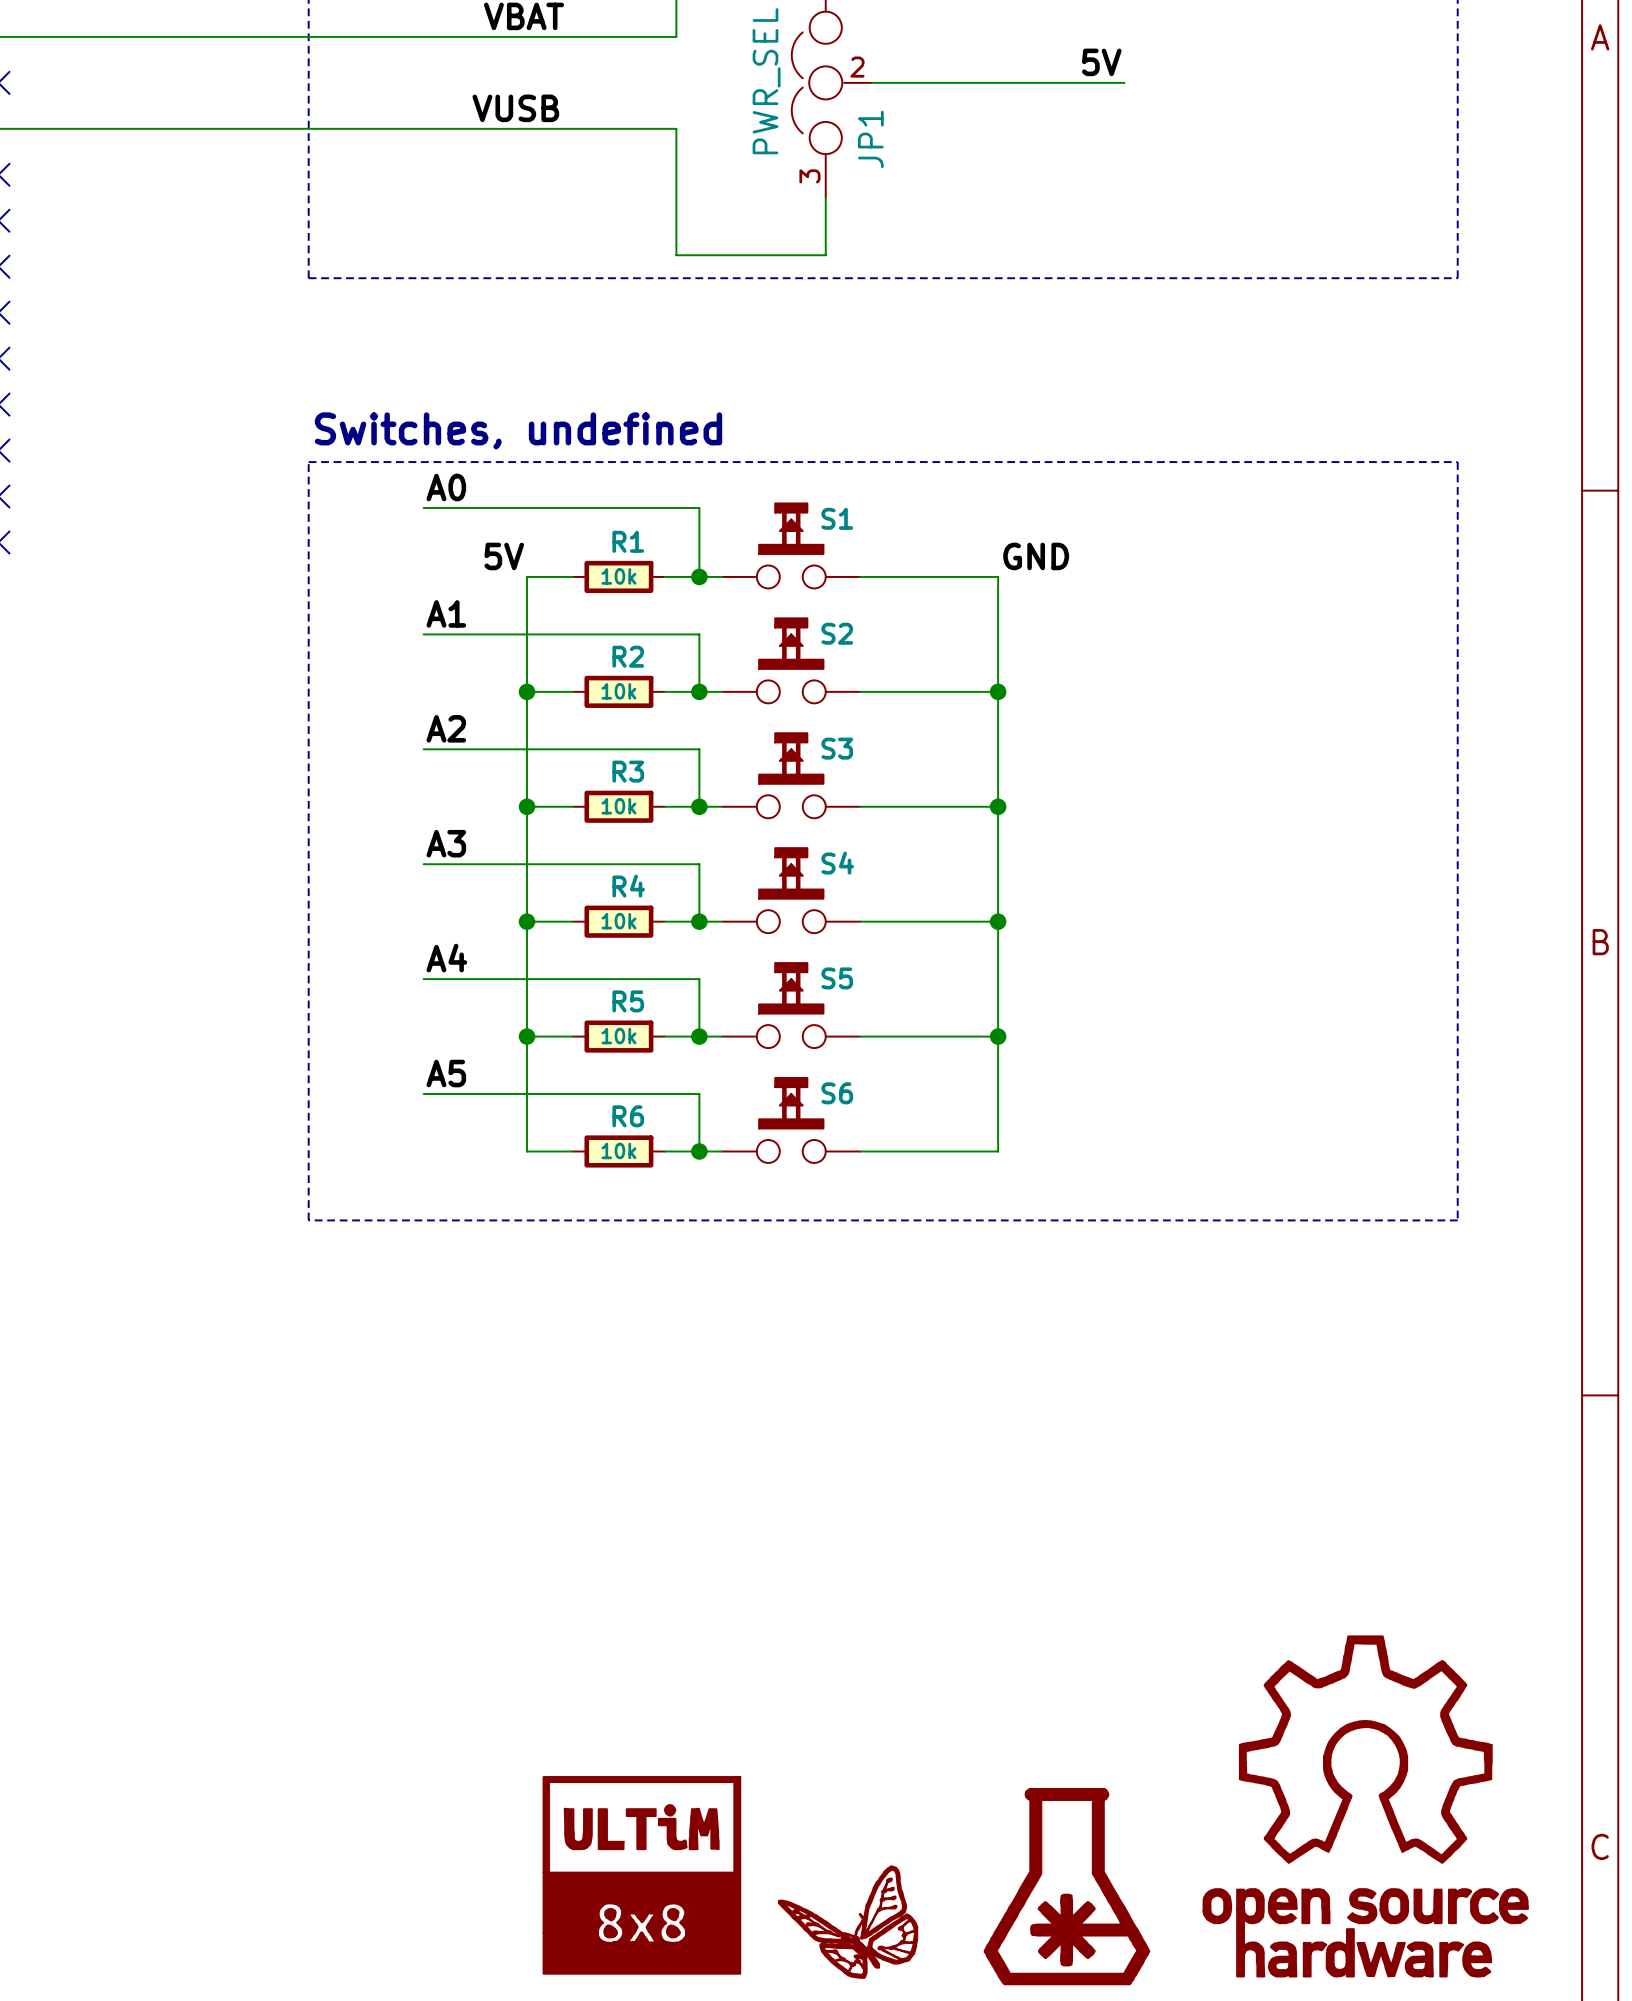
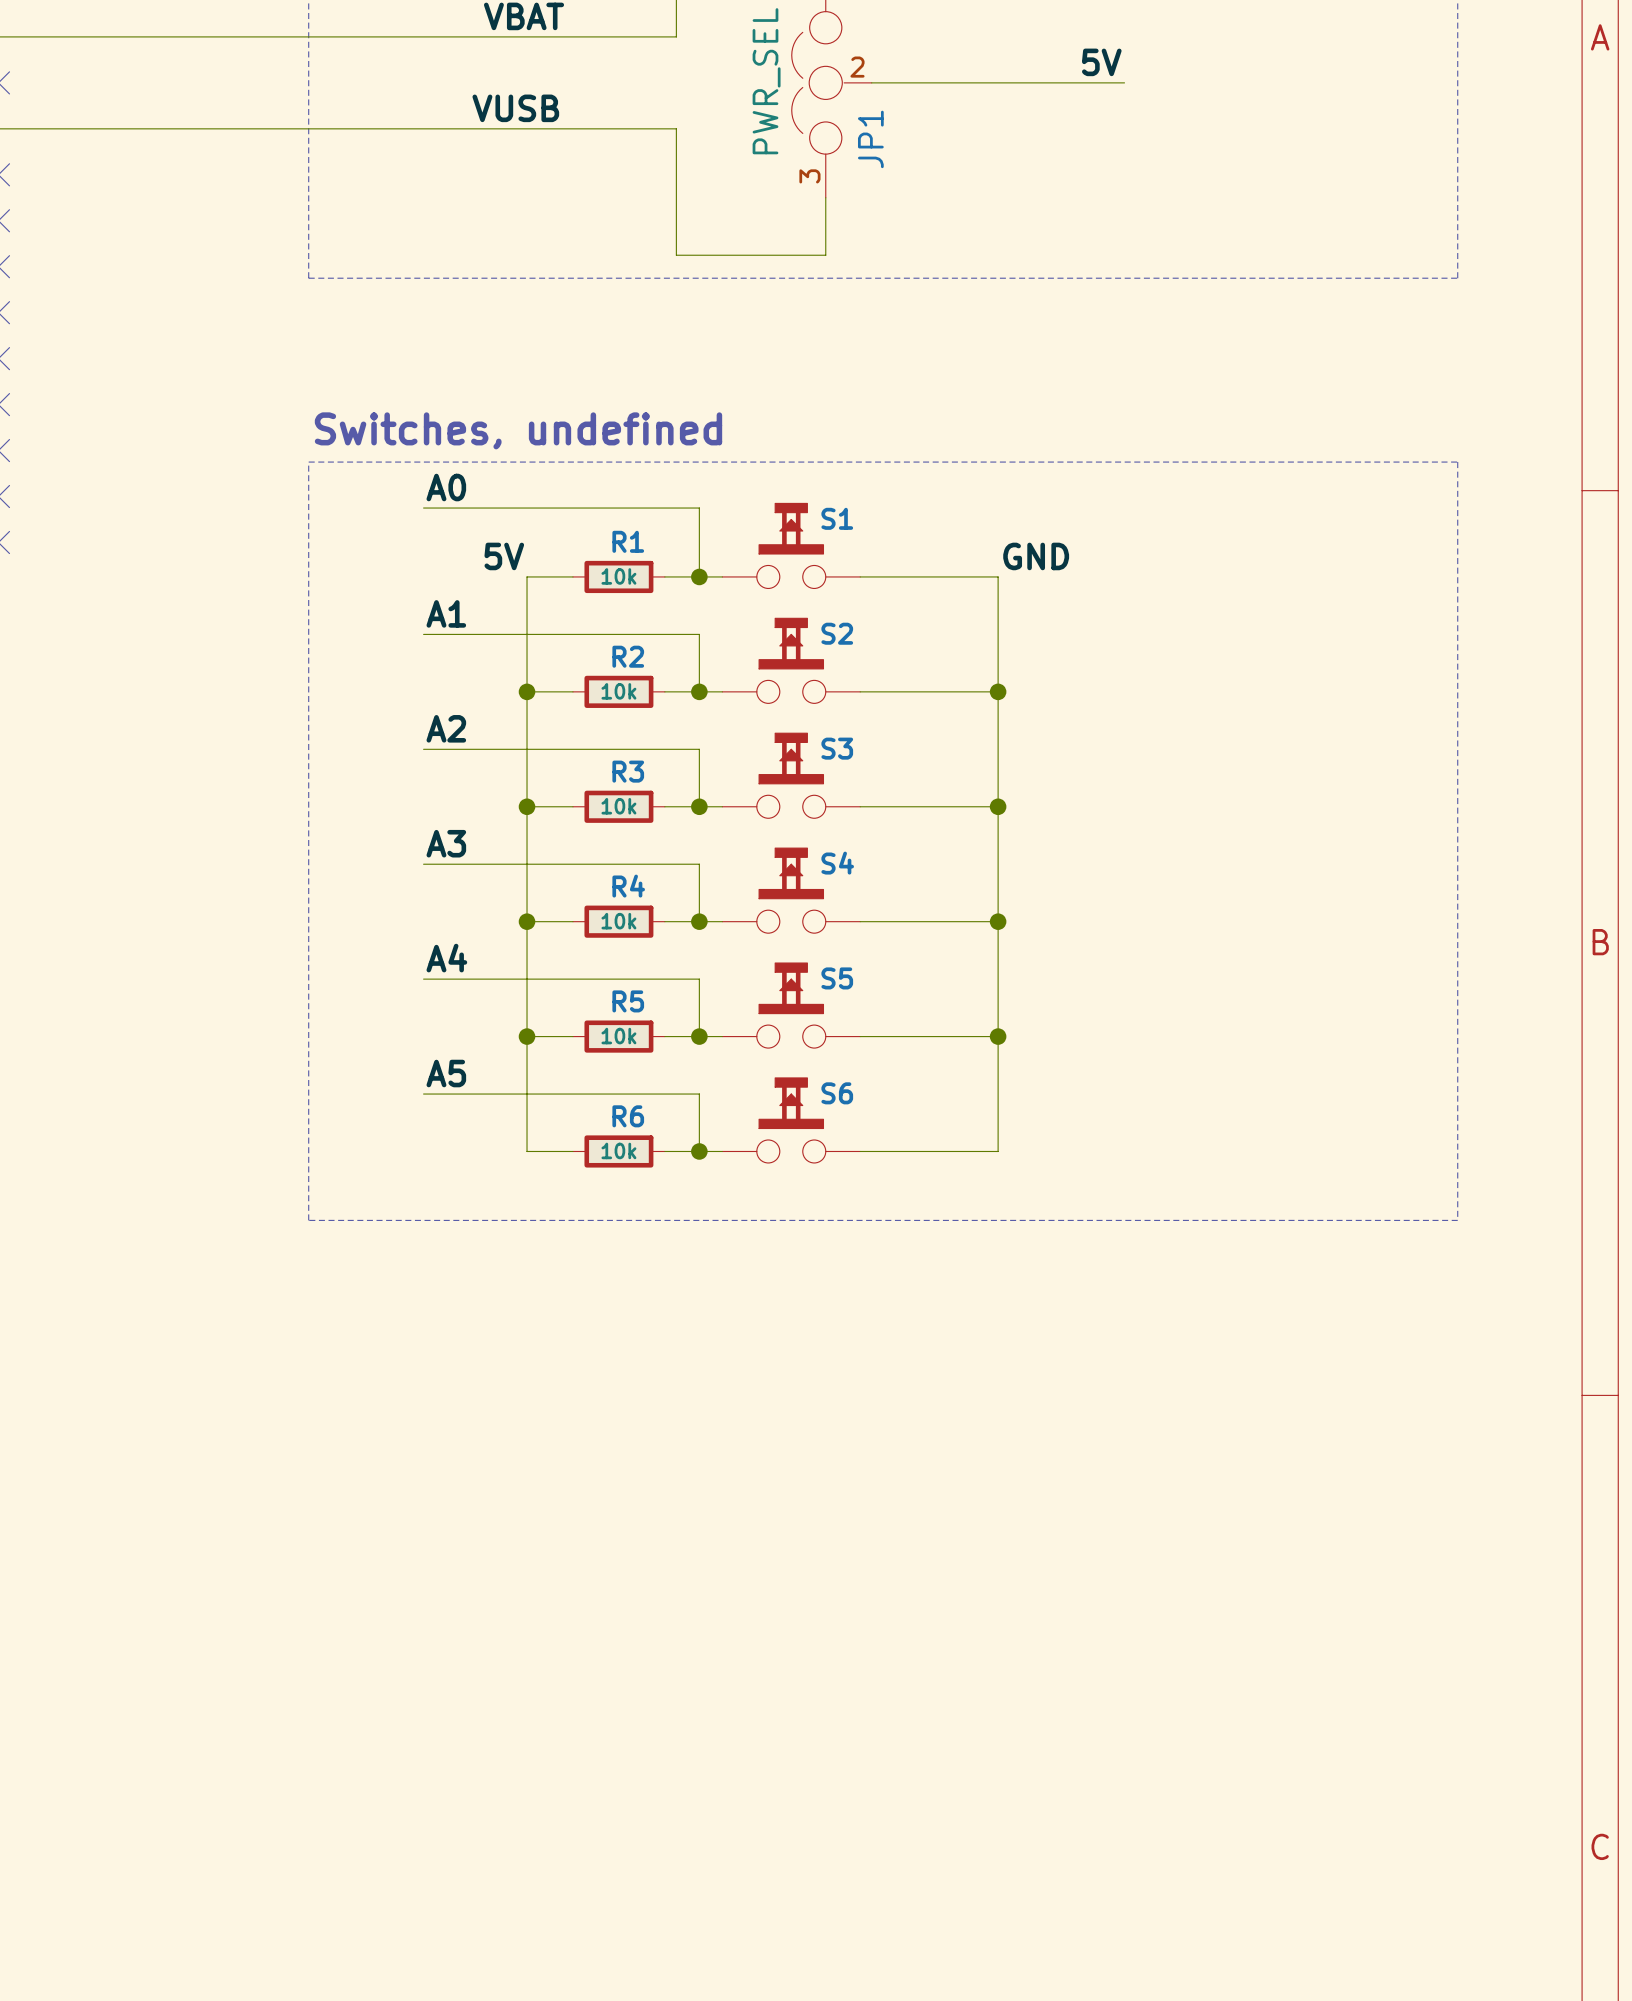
part: (1365, 1806) -> none
part: (641, 1875) -> none
part: (1067, 1886) -> none
part: (848, 1922) -> none

